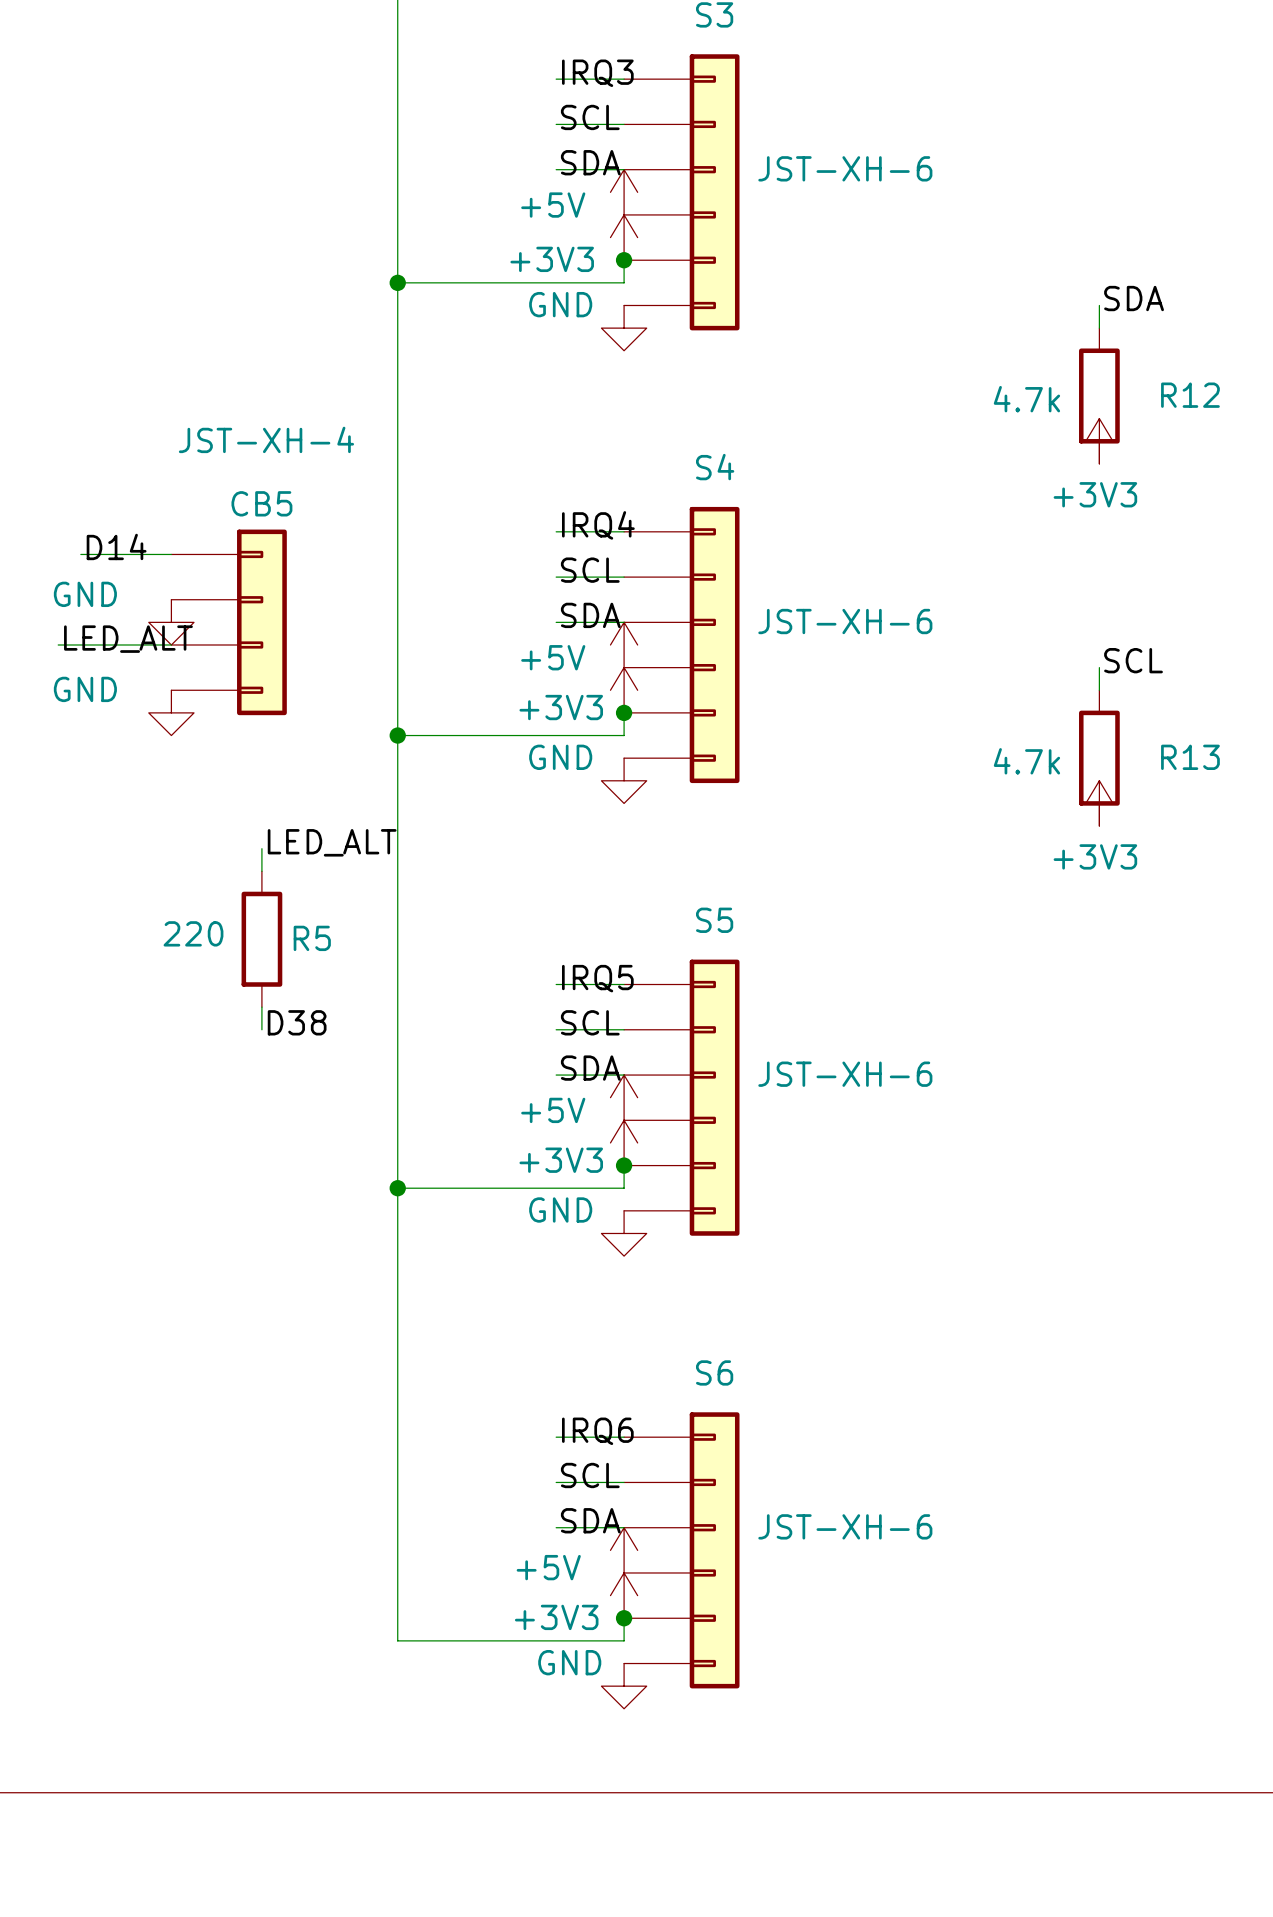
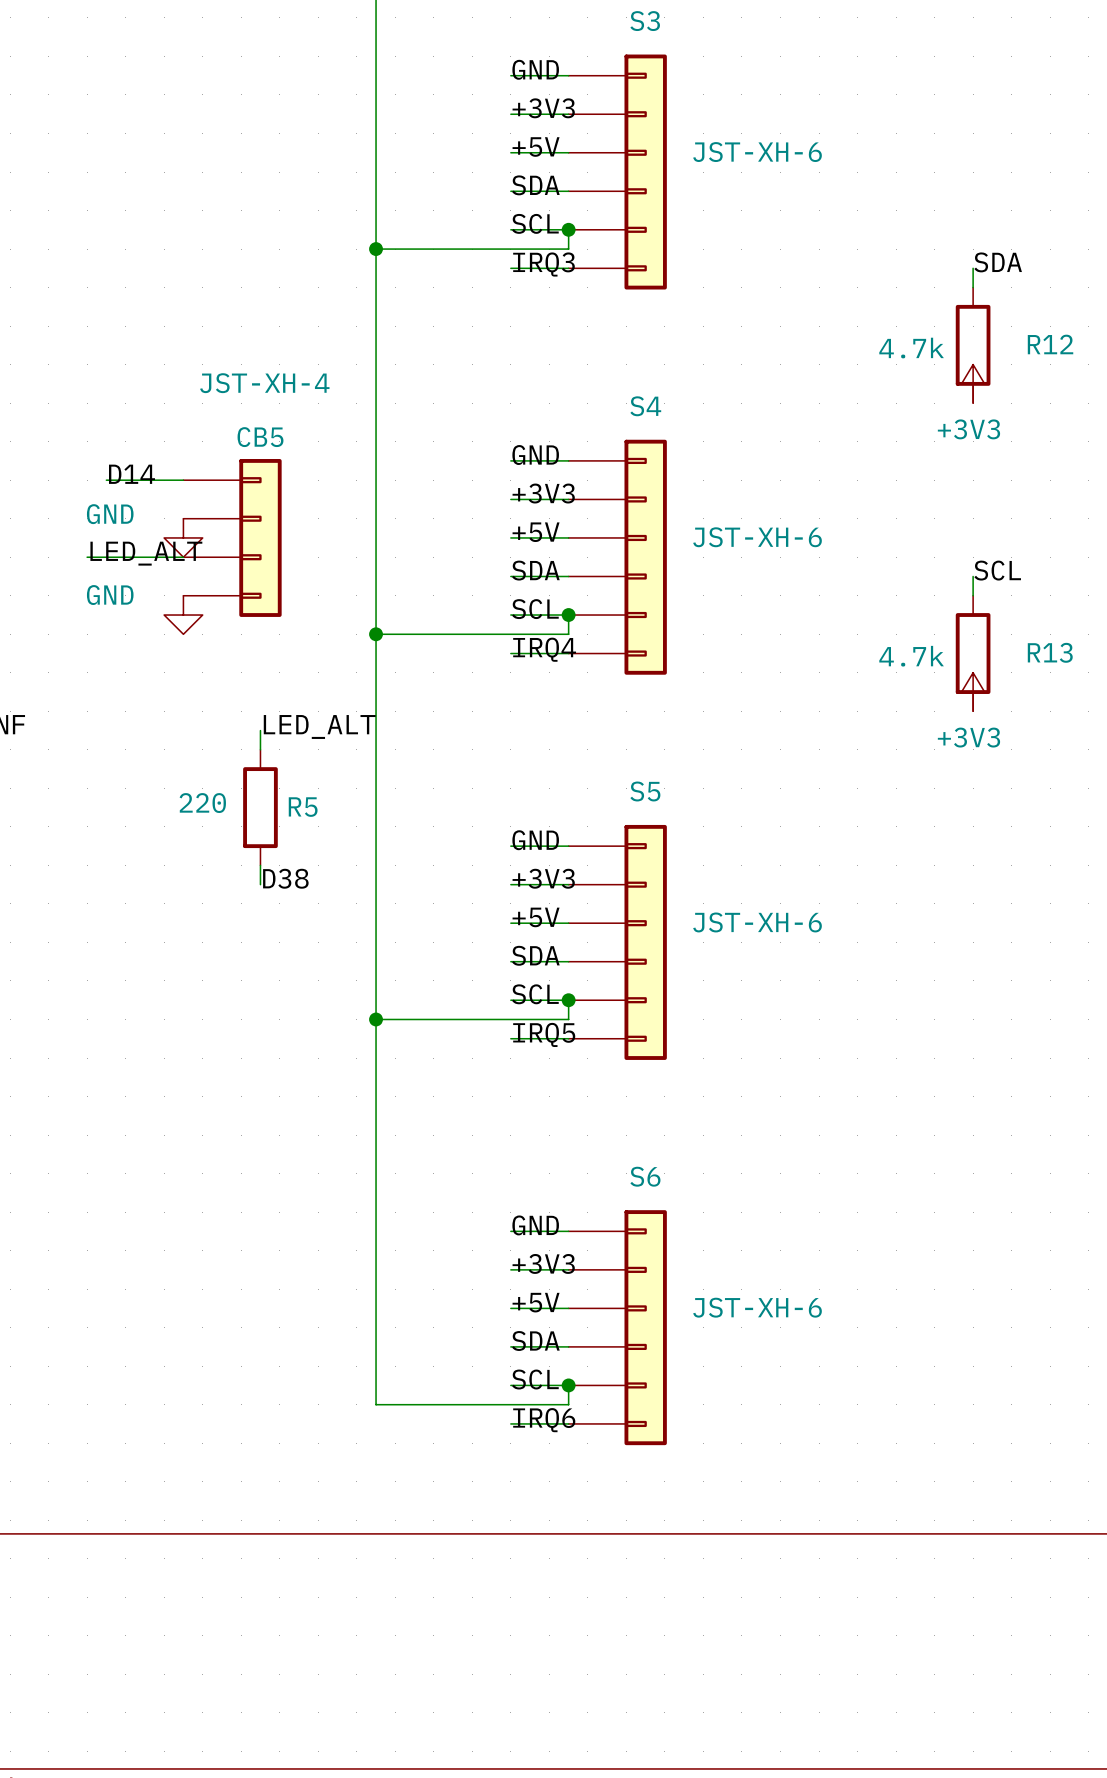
label: IRQ3 (597, 73) -> GND (535, 69)
label: SCL (590, 117) -> +3V3 (543, 108)
label: SDA (590, 162) -> +5V (536, 147)
power symbol: +5V (624, 192) -> none
label: none -> SDA (535, 185)
wire: none -> (510, 191) (568, 191)
power symbol: +3V3 (624, 237) -> none
label: none -> SCL (535, 223)
wire: none -> (510, 229) (568, 229)
label: none -> IRQ3 (543, 264)
wire: none -> (510, 268) (568, 268)
power symbol: GND (624, 328) -> none
label: IRQ4 (598, 525) -> GND (535, 455)
label: SCL (590, 570) -> +3V3 (543, 493)
label: SDA (590, 615) -> +5V (536, 532)
power symbol: +5V (624, 644) -> none
label: none -> SDA (535, 570)
wire: none -> (510, 576) (568, 576)
power symbol: +3V3 (624, 690) -> none
label: none -> SCL (535, 609)
wire: none -> (510, 615) (568, 615)
label: none -> IRQ4 (544, 649)
wire: none -> (510, 653) (568, 653)
power symbol: GND (624, 780) -> none
label: IRQ5 (597, 978) -> GND (535, 840)
label: SCL (590, 1022) -> +3V3 (543, 878)
label: SDA (590, 1068) -> +5V (536, 917)
power symbol: +5V (624, 1097) -> none
label: none -> SDA (535, 955)
wire: none -> (510, 961) (568, 961)
power symbol: +3V3 (624, 1142) -> none
label: none -> SCL (535, 994)
wire: none -> (510, 1000) (568, 1000)
label: none -> IRQ5 (544, 1034)
wire: none -> (510, 1038) (568, 1038)
power symbol: GND (624, 1233) -> none
label: IRQ6 (597, 1431) -> GND (535, 1225)
label: SCL (590, 1475) -> +3V3 (543, 1263)
label: SDA (590, 1520) -> +5V (536, 1302)
power symbol: +5V (624, 1550) -> none
label: none -> SDA (535, 1341)
wire: none -> (510, 1346) (568, 1346)
power symbol: +3V3 (624, 1595) -> none
label: none -> SCL (535, 1379)
wire: none -> (510, 1385) (568, 1385)
label: none -> IRQ6 (544, 1420)
wire: none -> (510, 1423) (568, 1423)
power symbol: GND (624, 1686) -> none

